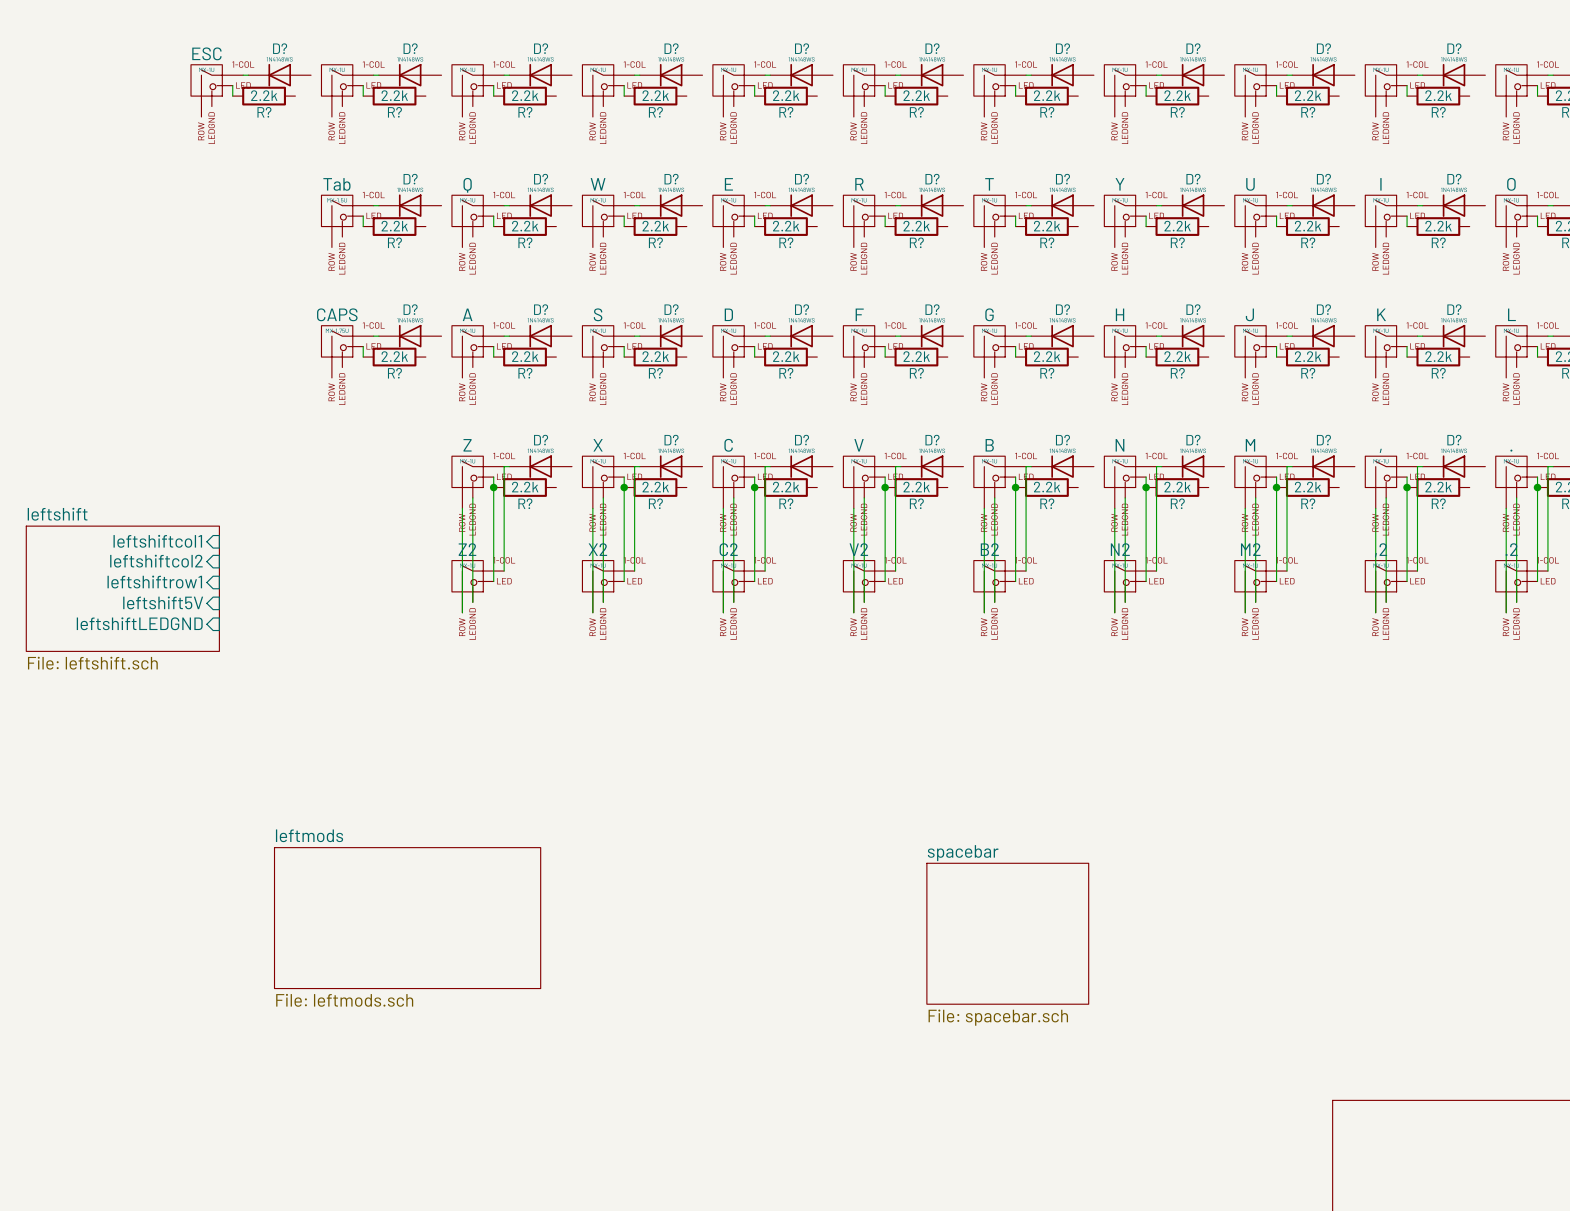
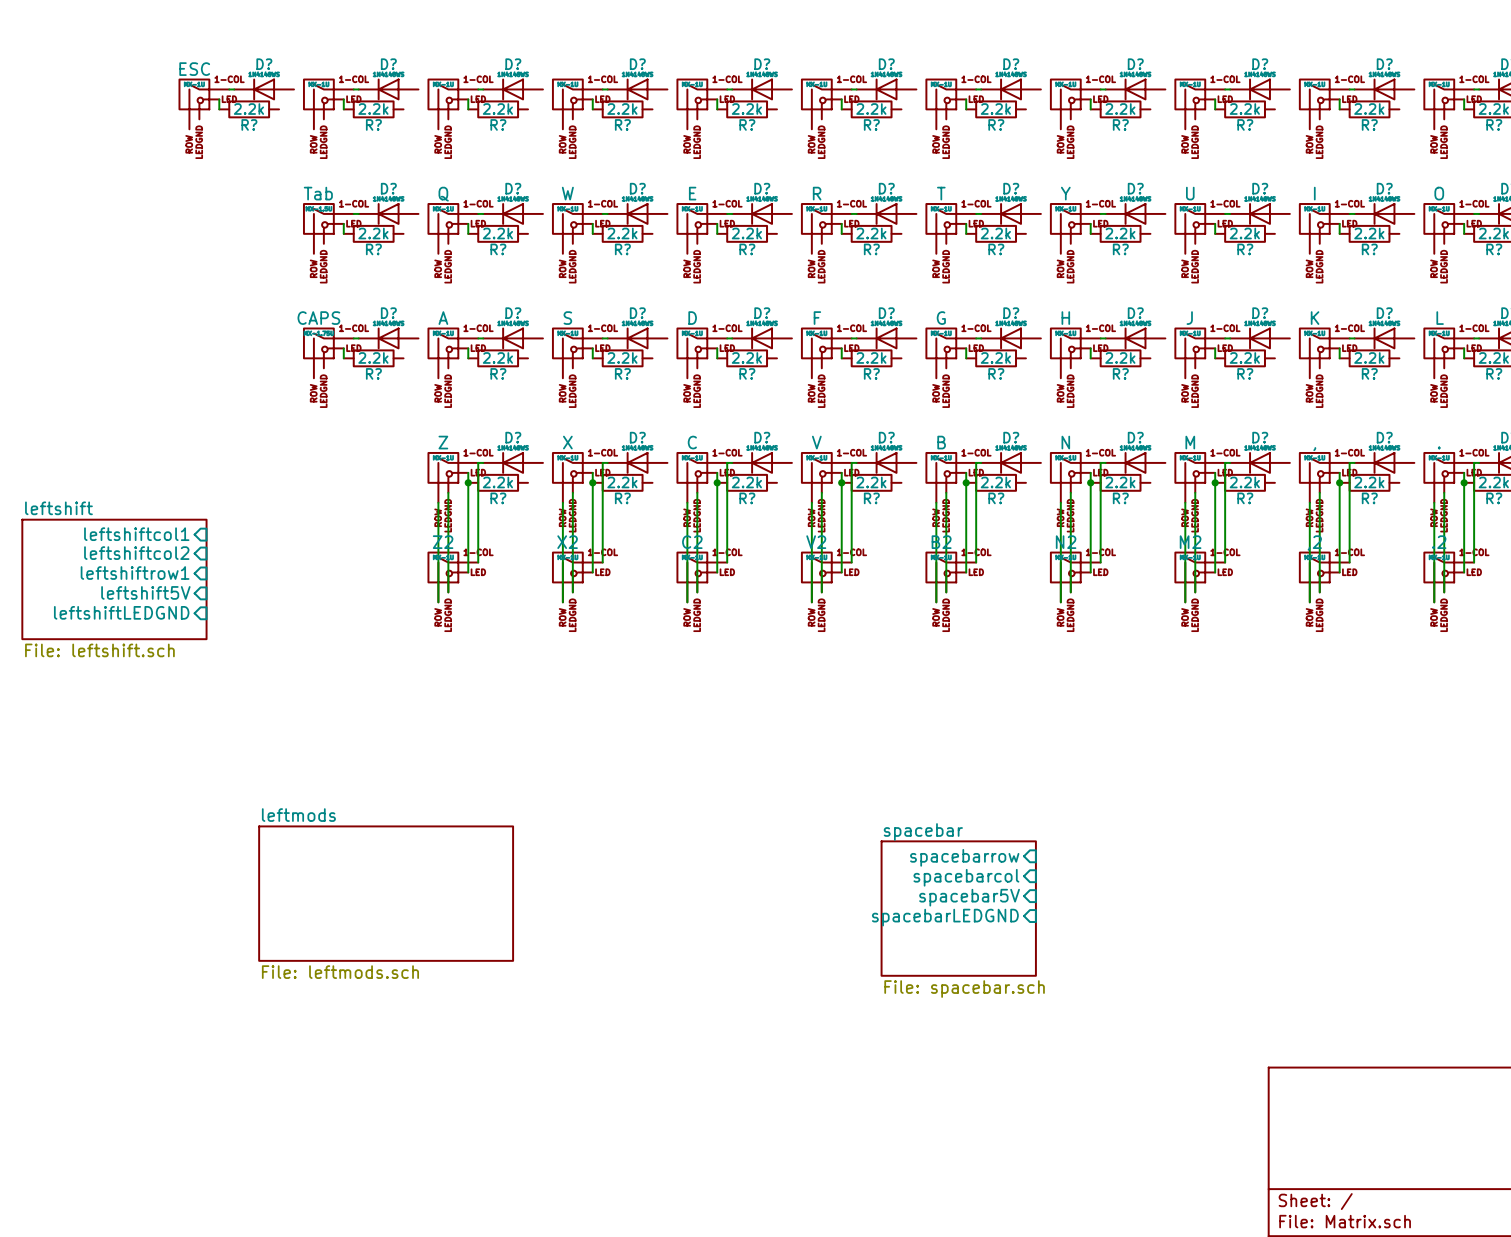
sheet pin: none -> spacebarrow (964, 857)
sheet pin: none -> spacebarcol (966, 877)
sheet pin: none -> spacebar5V (969, 897)
sheet pin: none -> spacebarLEDGND (945, 917)

